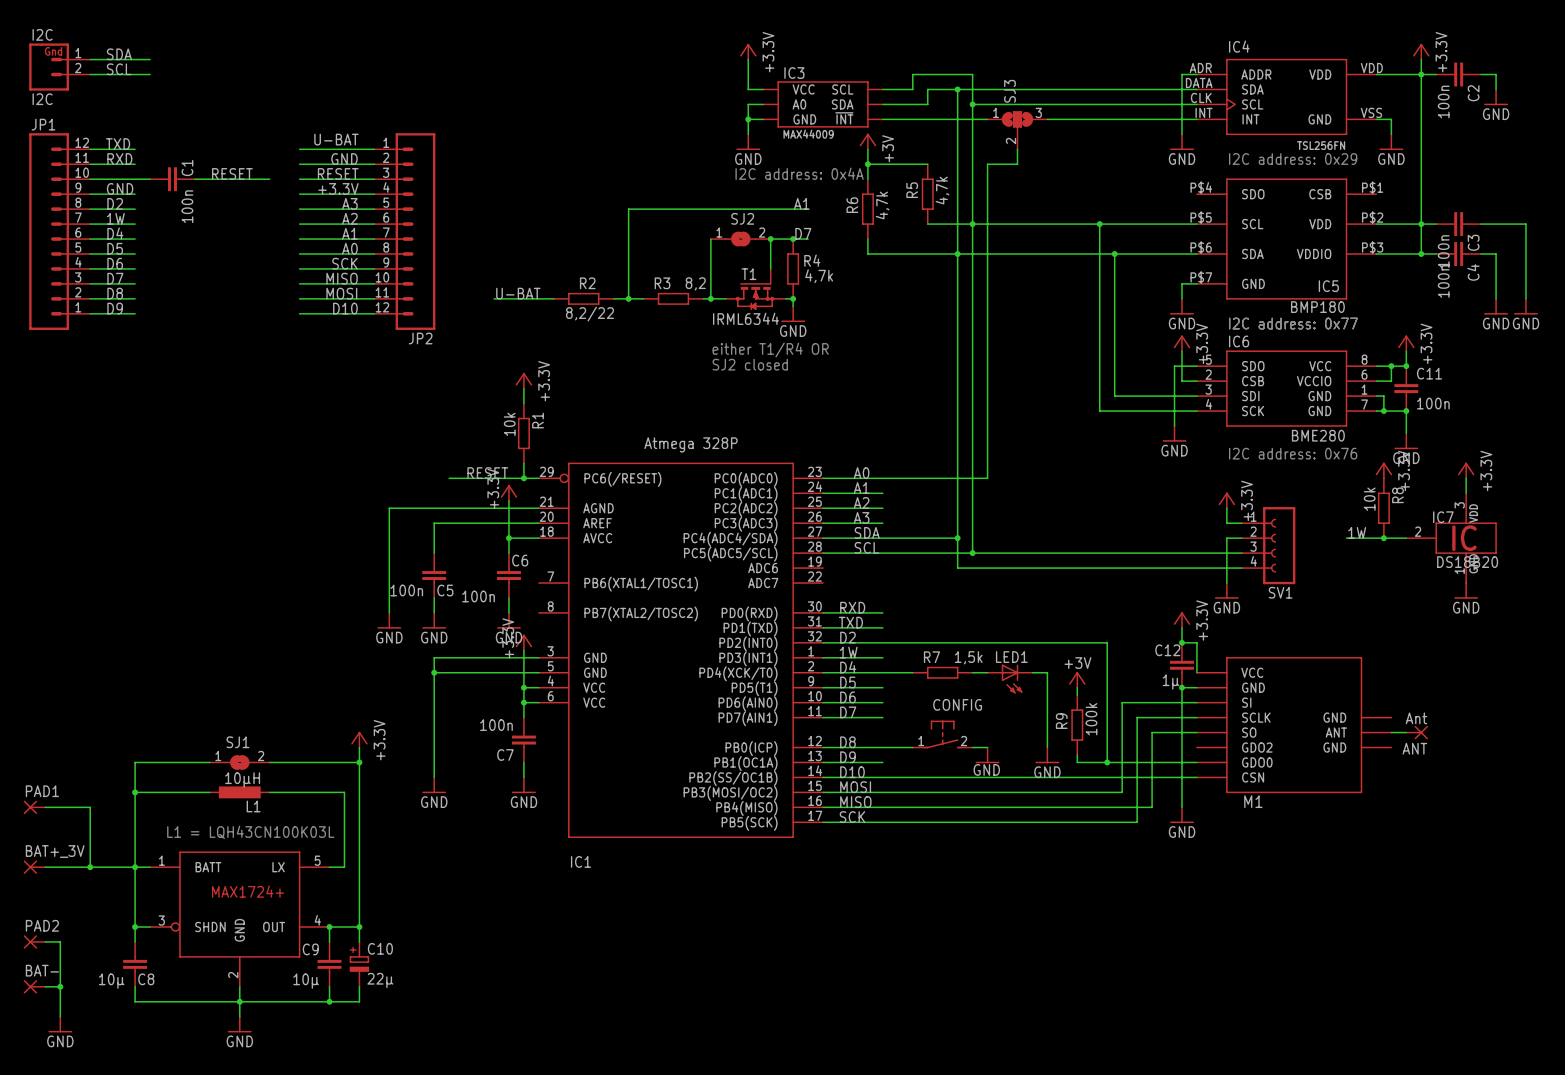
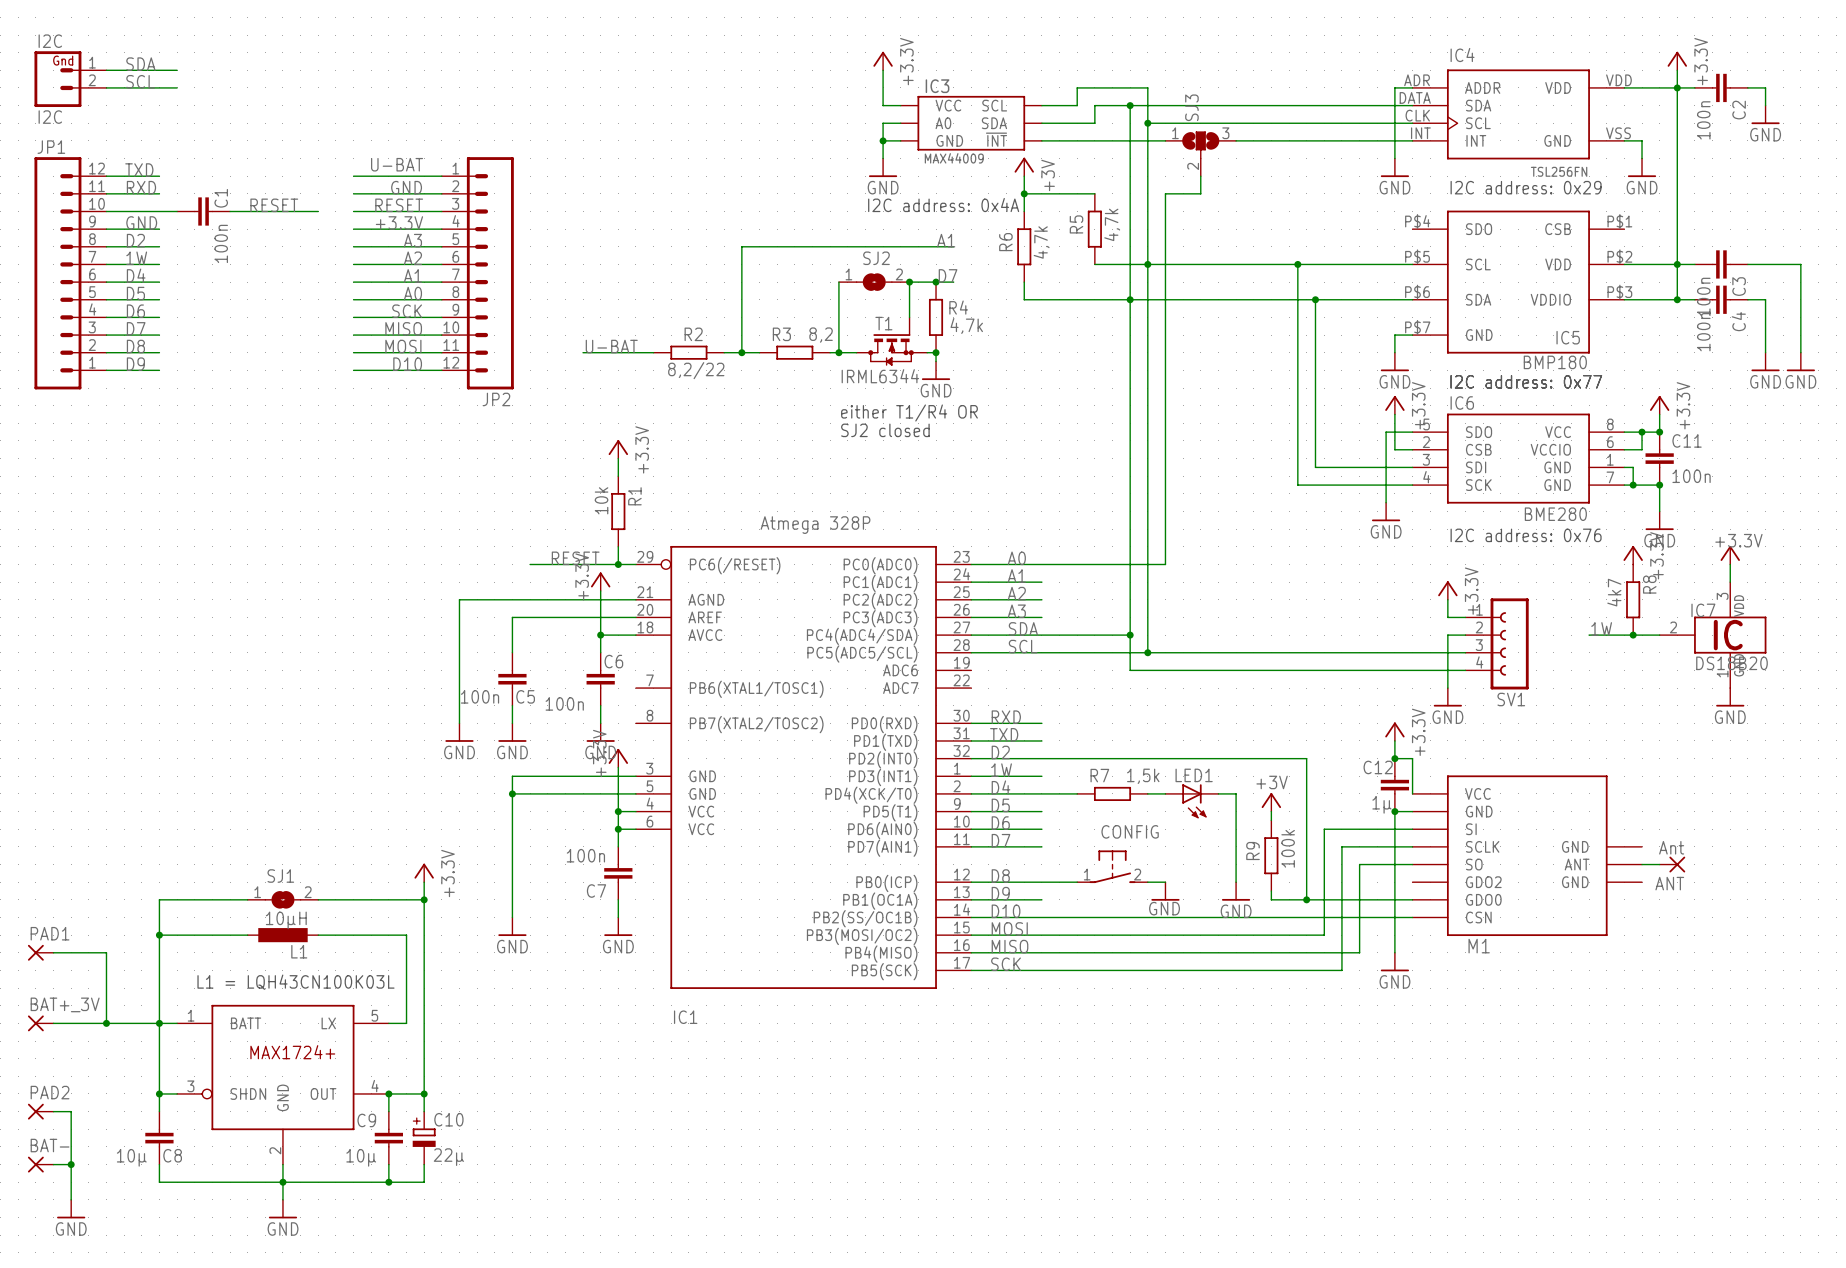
power symbol text rotation: 0° (1486, 470) -> 90° clockwise (1738, 540)
R8 value: 10k (1369, 499) -> 4k7 (1614, 592)

